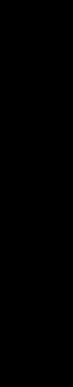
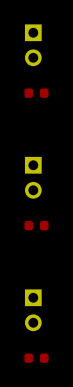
part: none -> (33, 45)
part: none -> (36, 93)
part: none -> (33, 177)
part: none -> (36, 225)
part: none -> (33, 310)
part: none -> (36, 358)

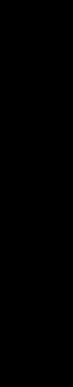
part: (33, 45) -> none
part: (36, 93) -> none
part: (33, 177) -> none
part: (36, 225) -> none
part: (33, 310) -> none
part: (36, 358) -> none

